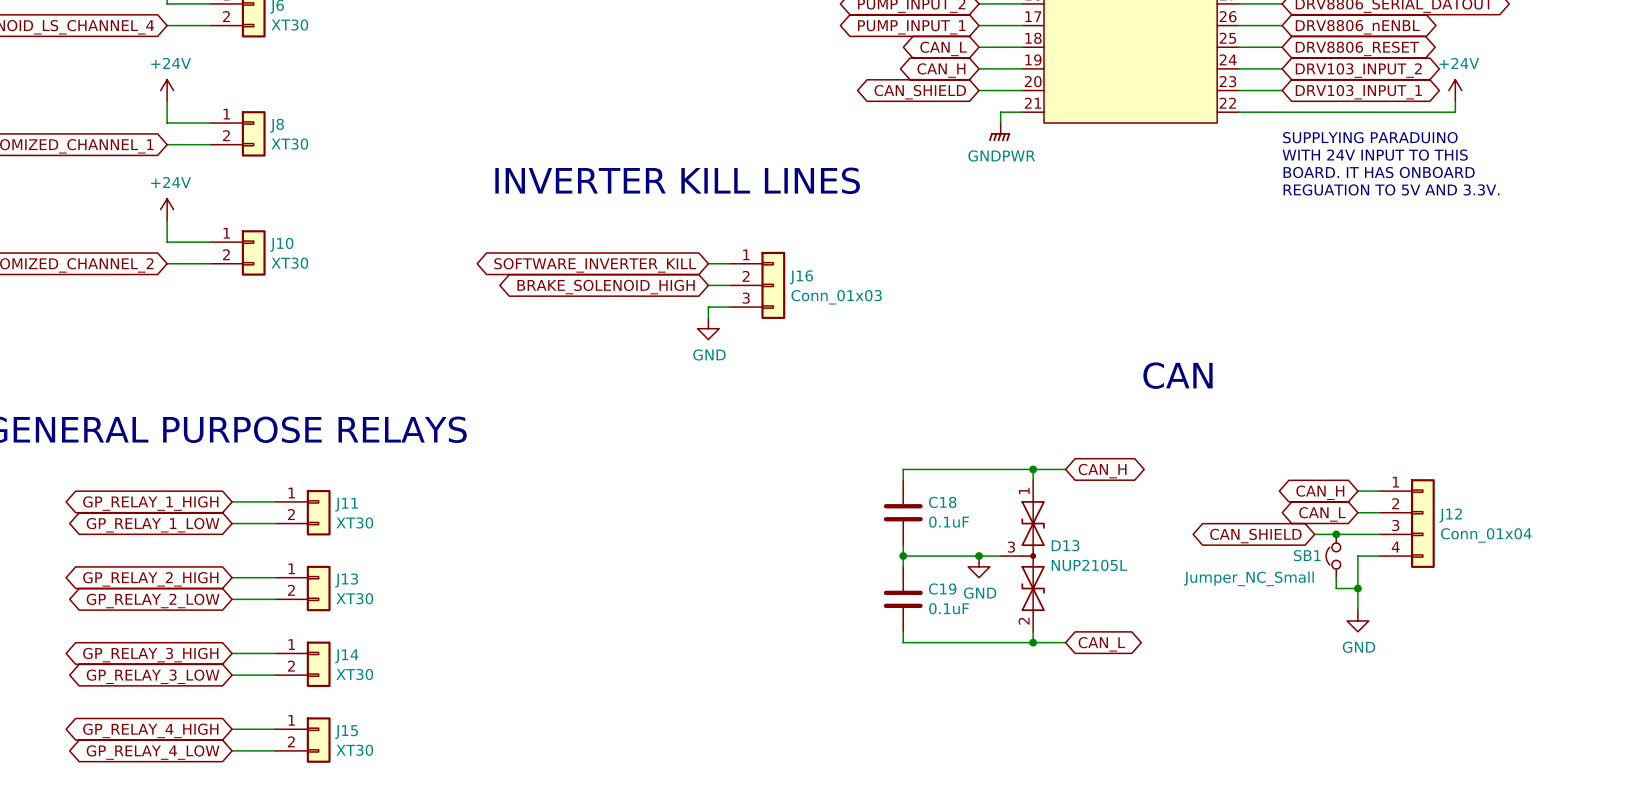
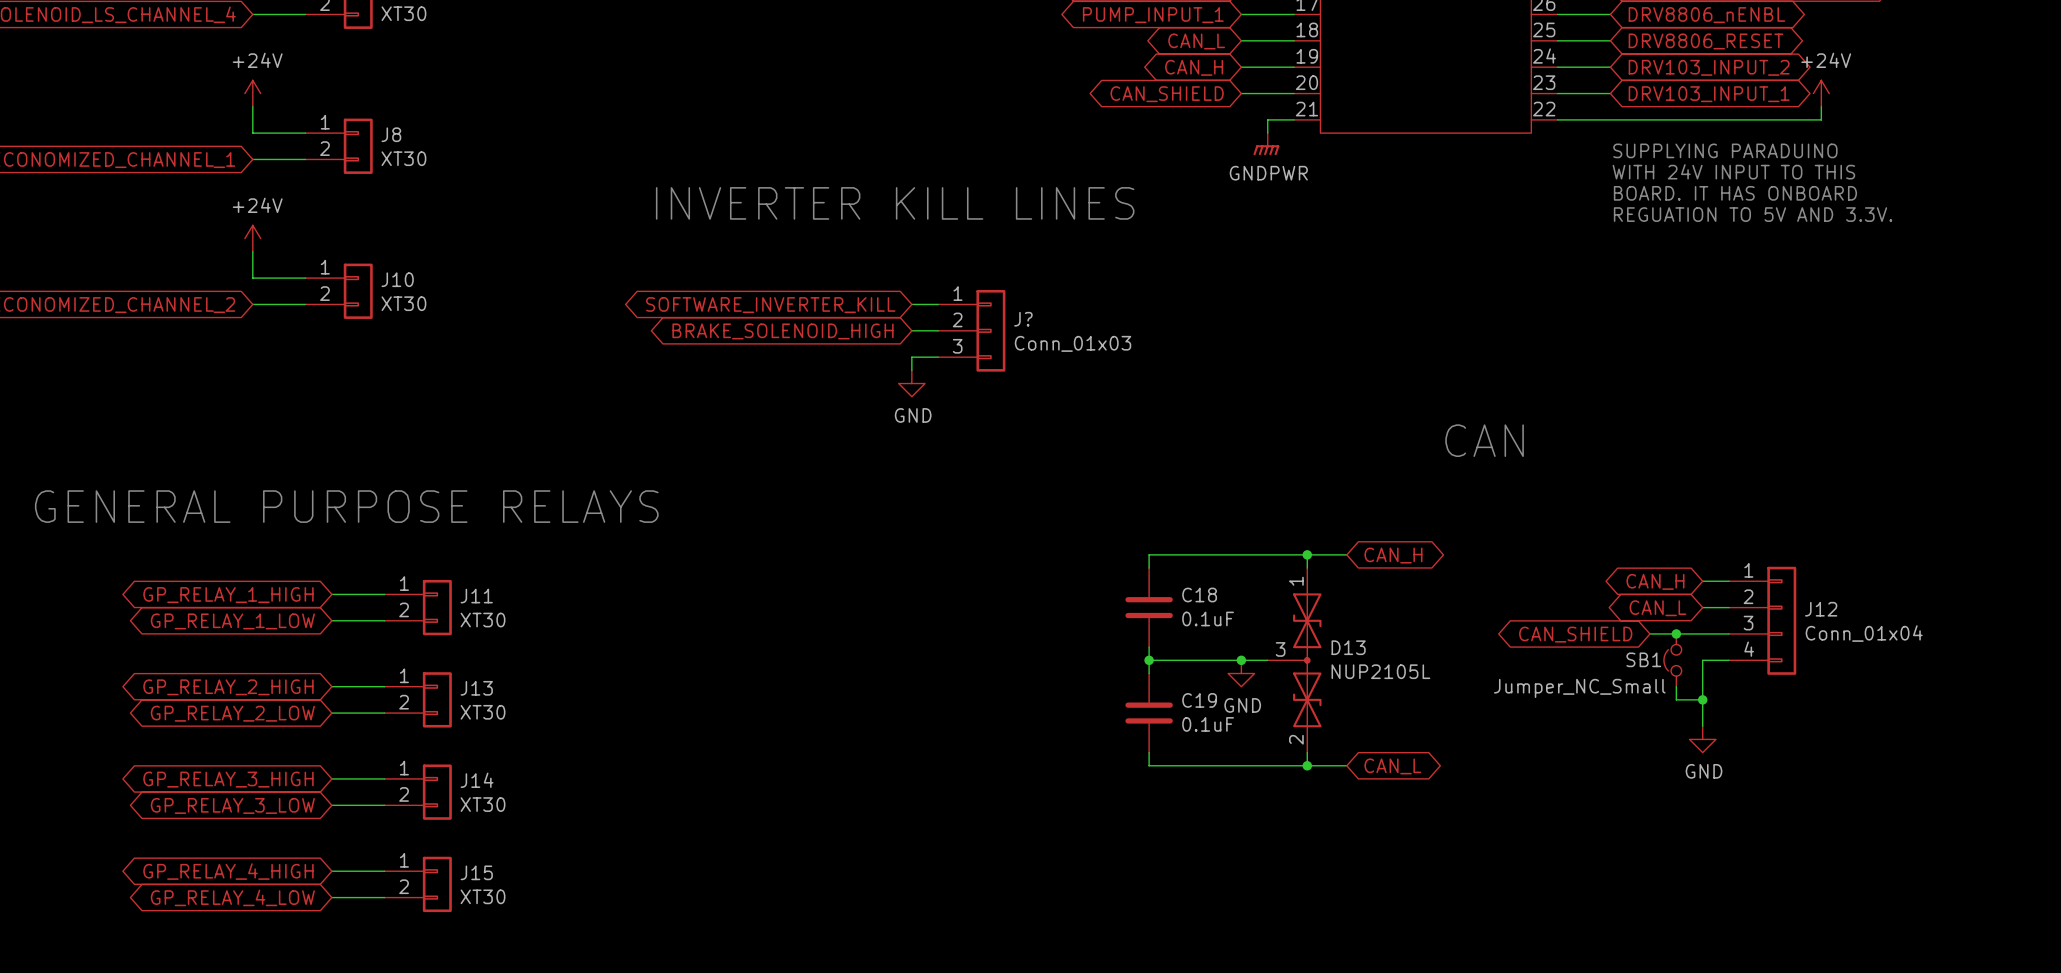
J16 name: J16 (801, 277) -> J? (1023, 319)

